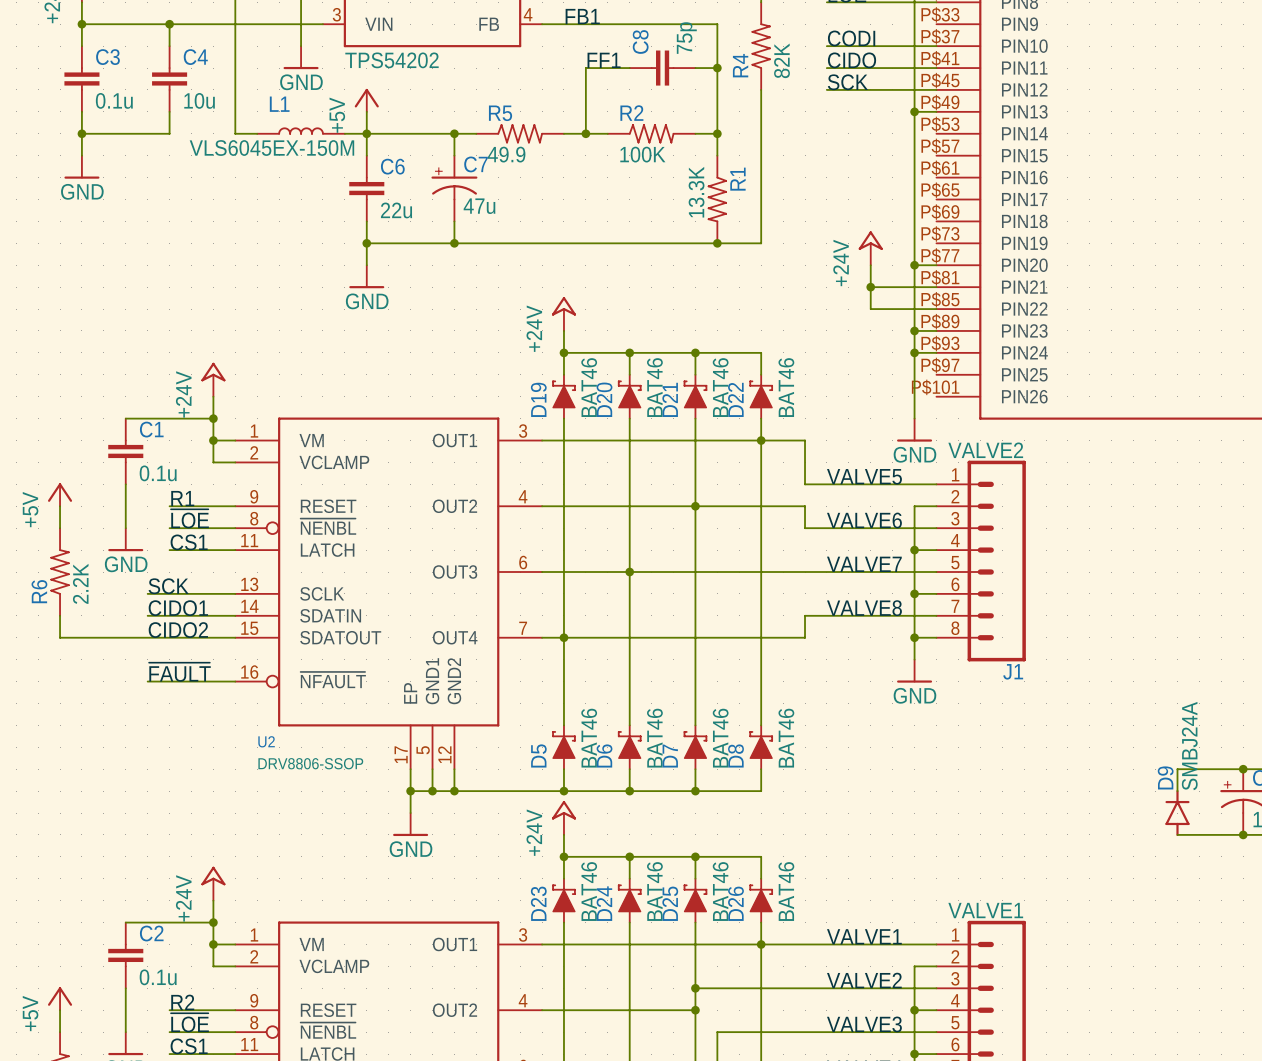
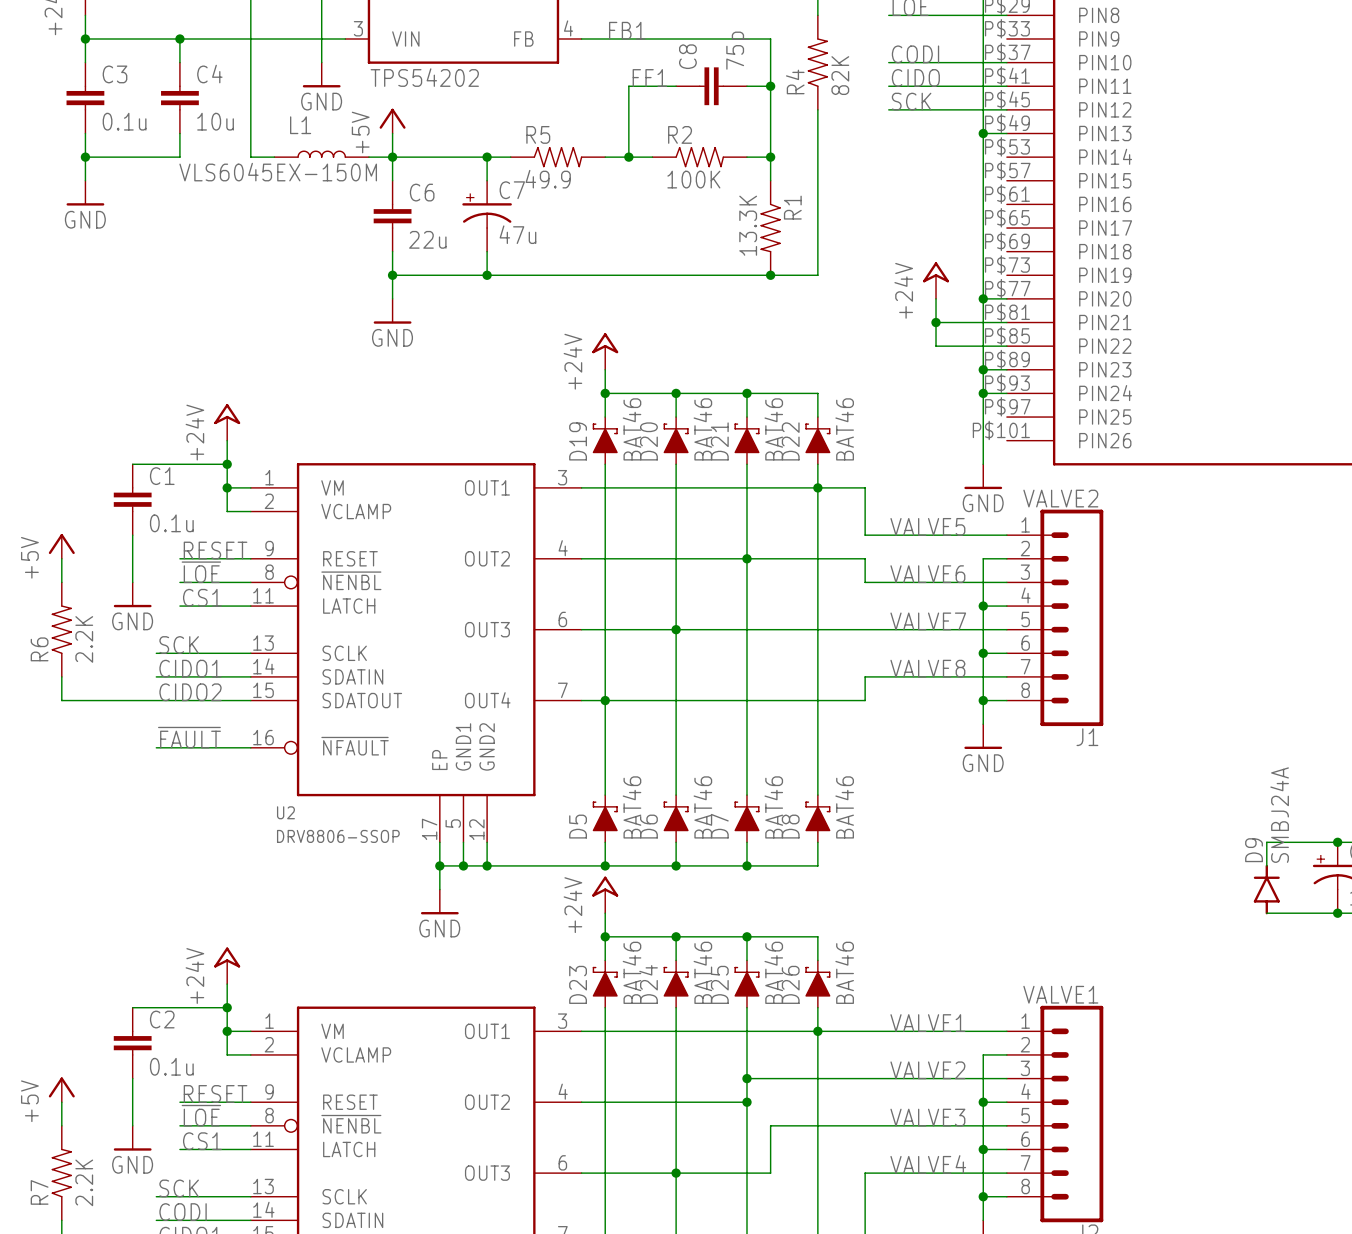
label: R1 (182, 498) -> RESET (215, 550)
label: R2 (182, 1002) -> RESET (215, 1093)

